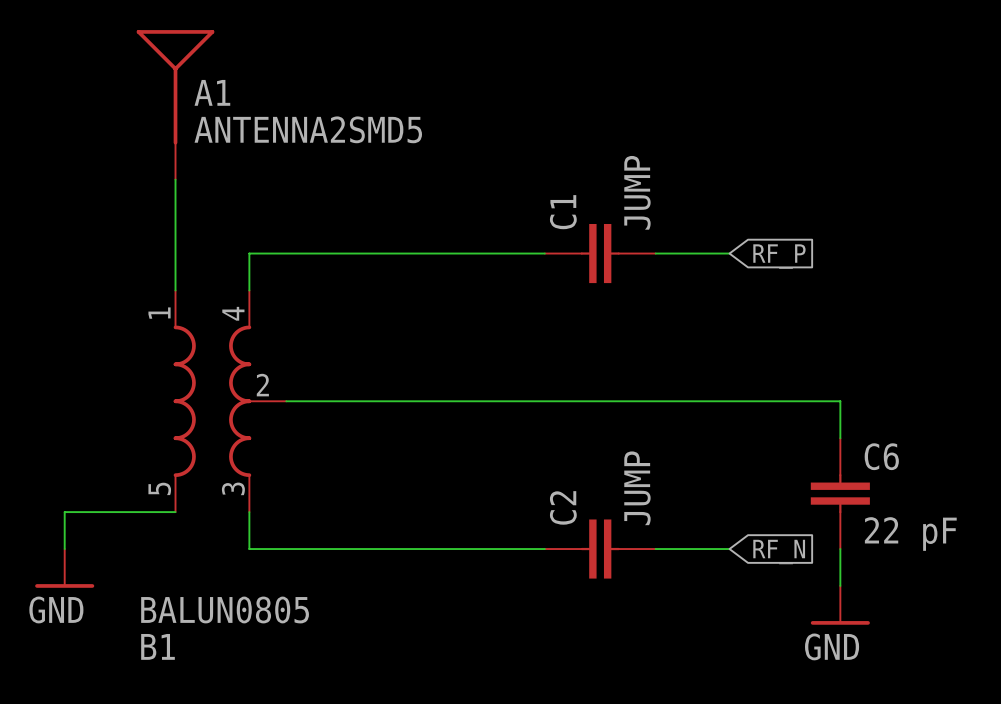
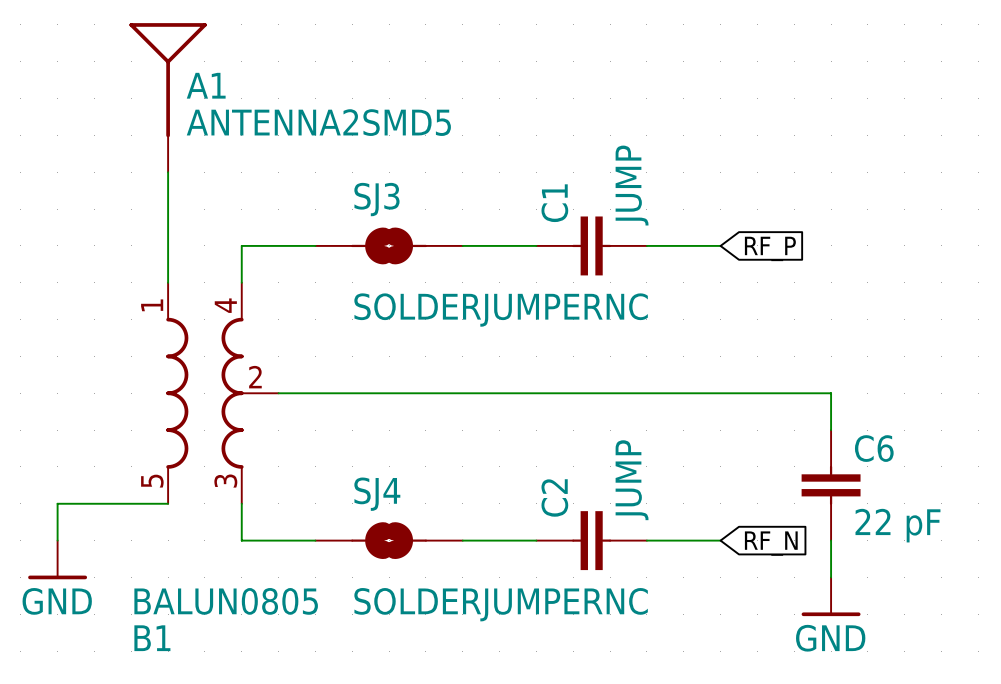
SJ3: none -> SOLDERJUMPERNC (389, 245)
SJ4: none -> SOLDERJUMPERNC (389, 540)

